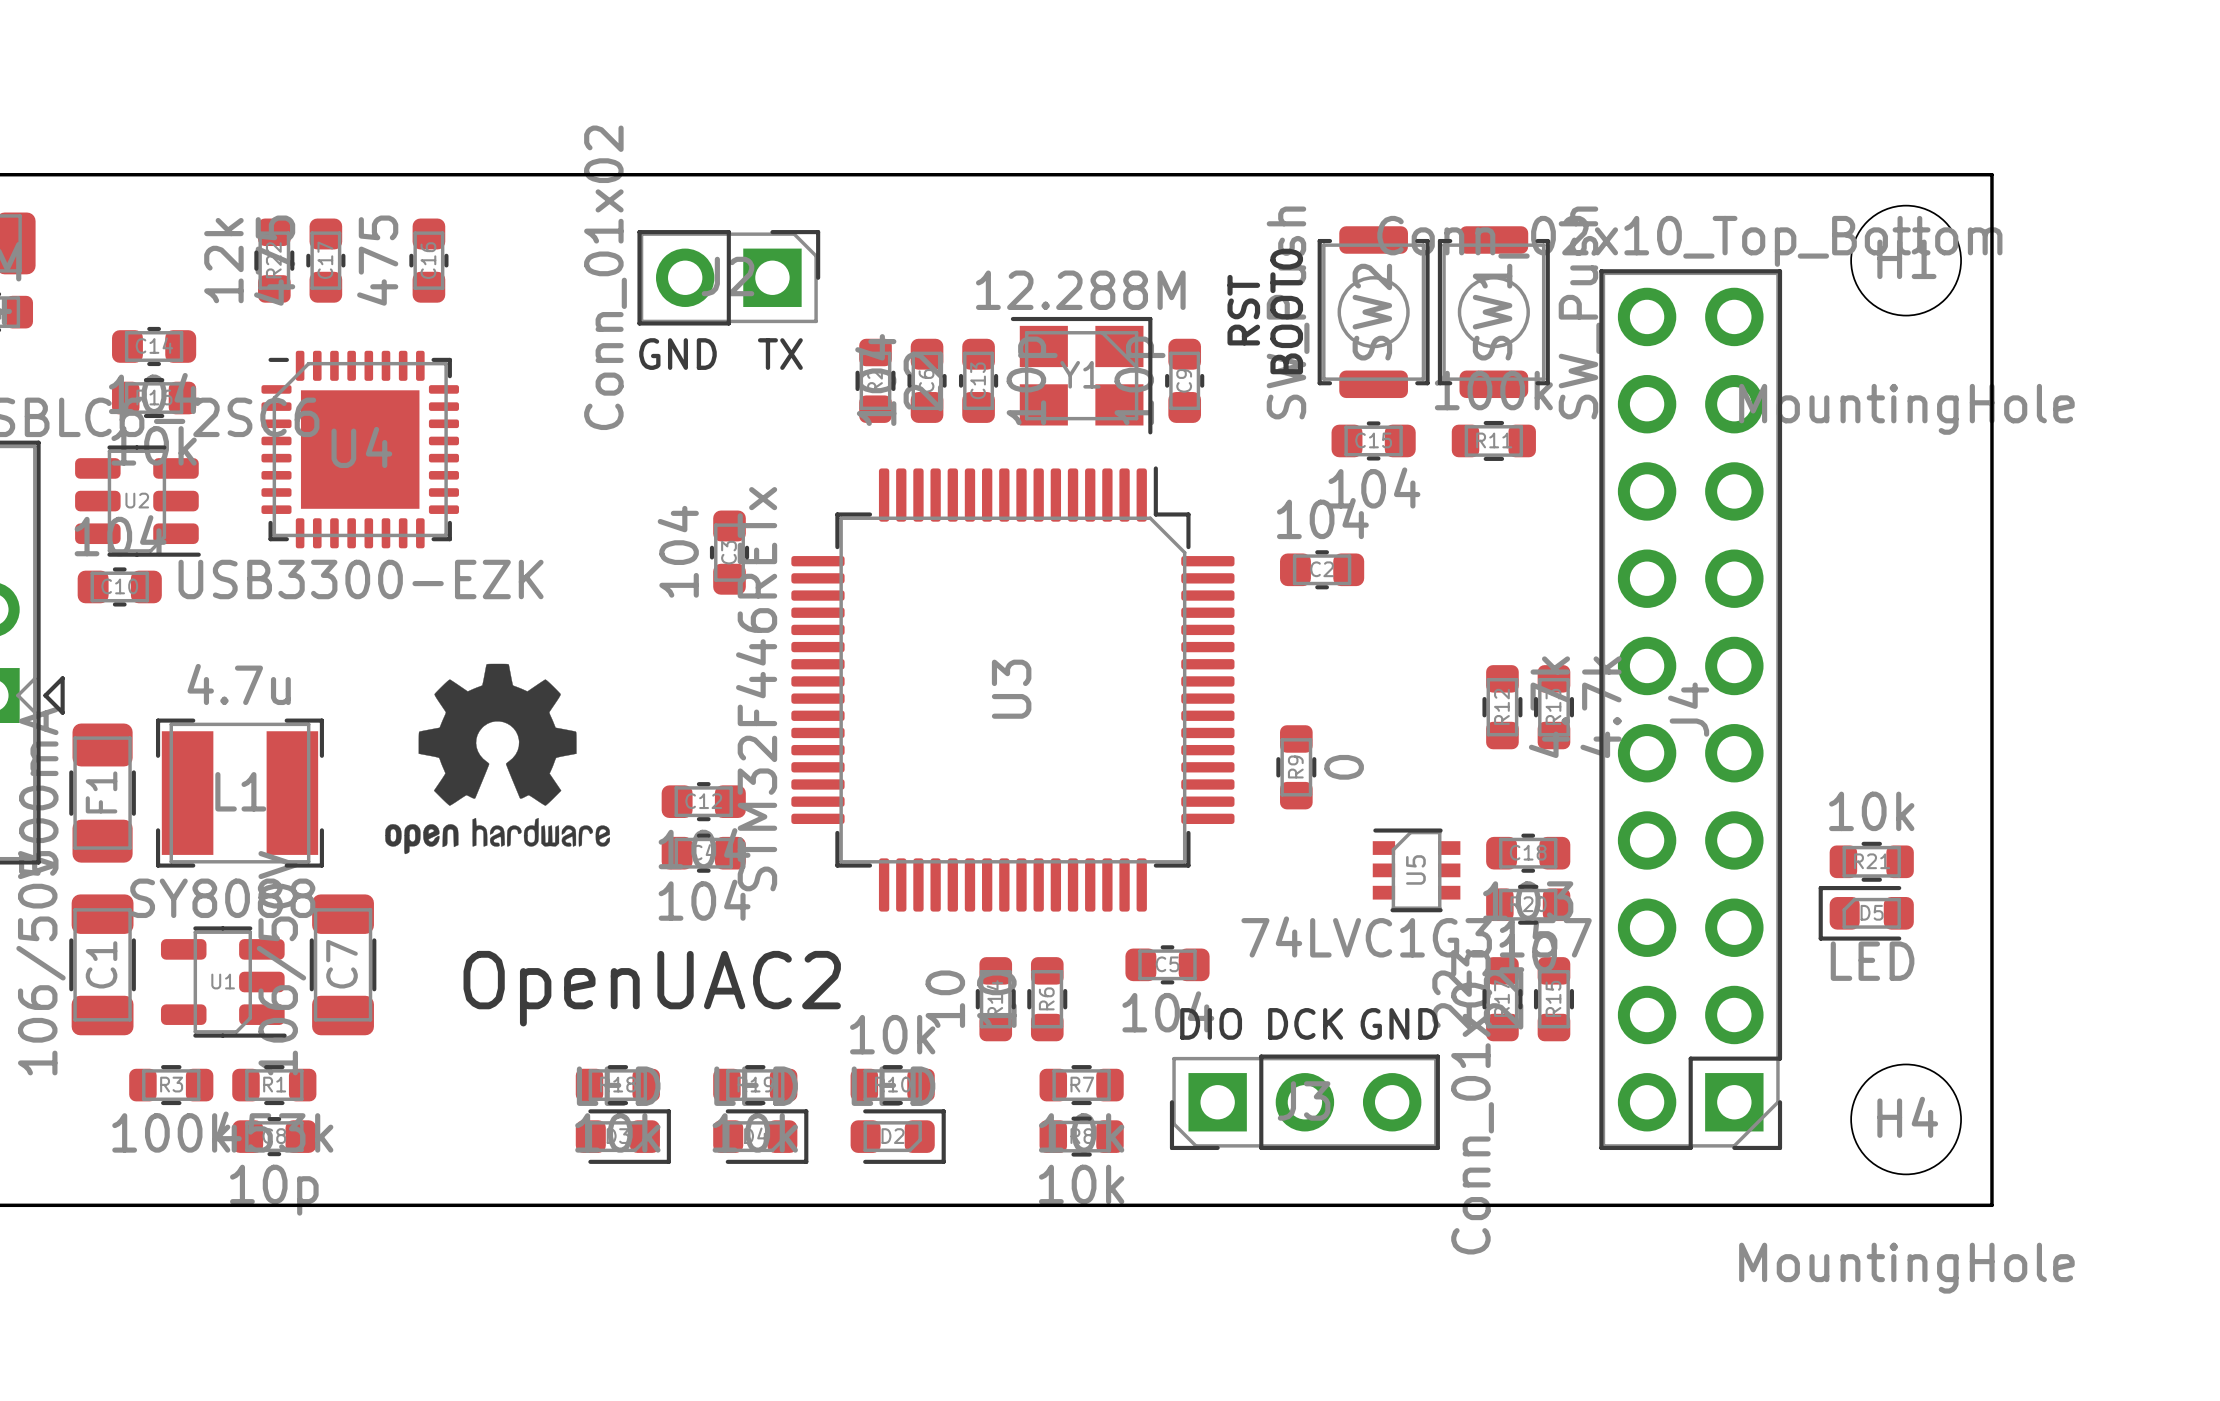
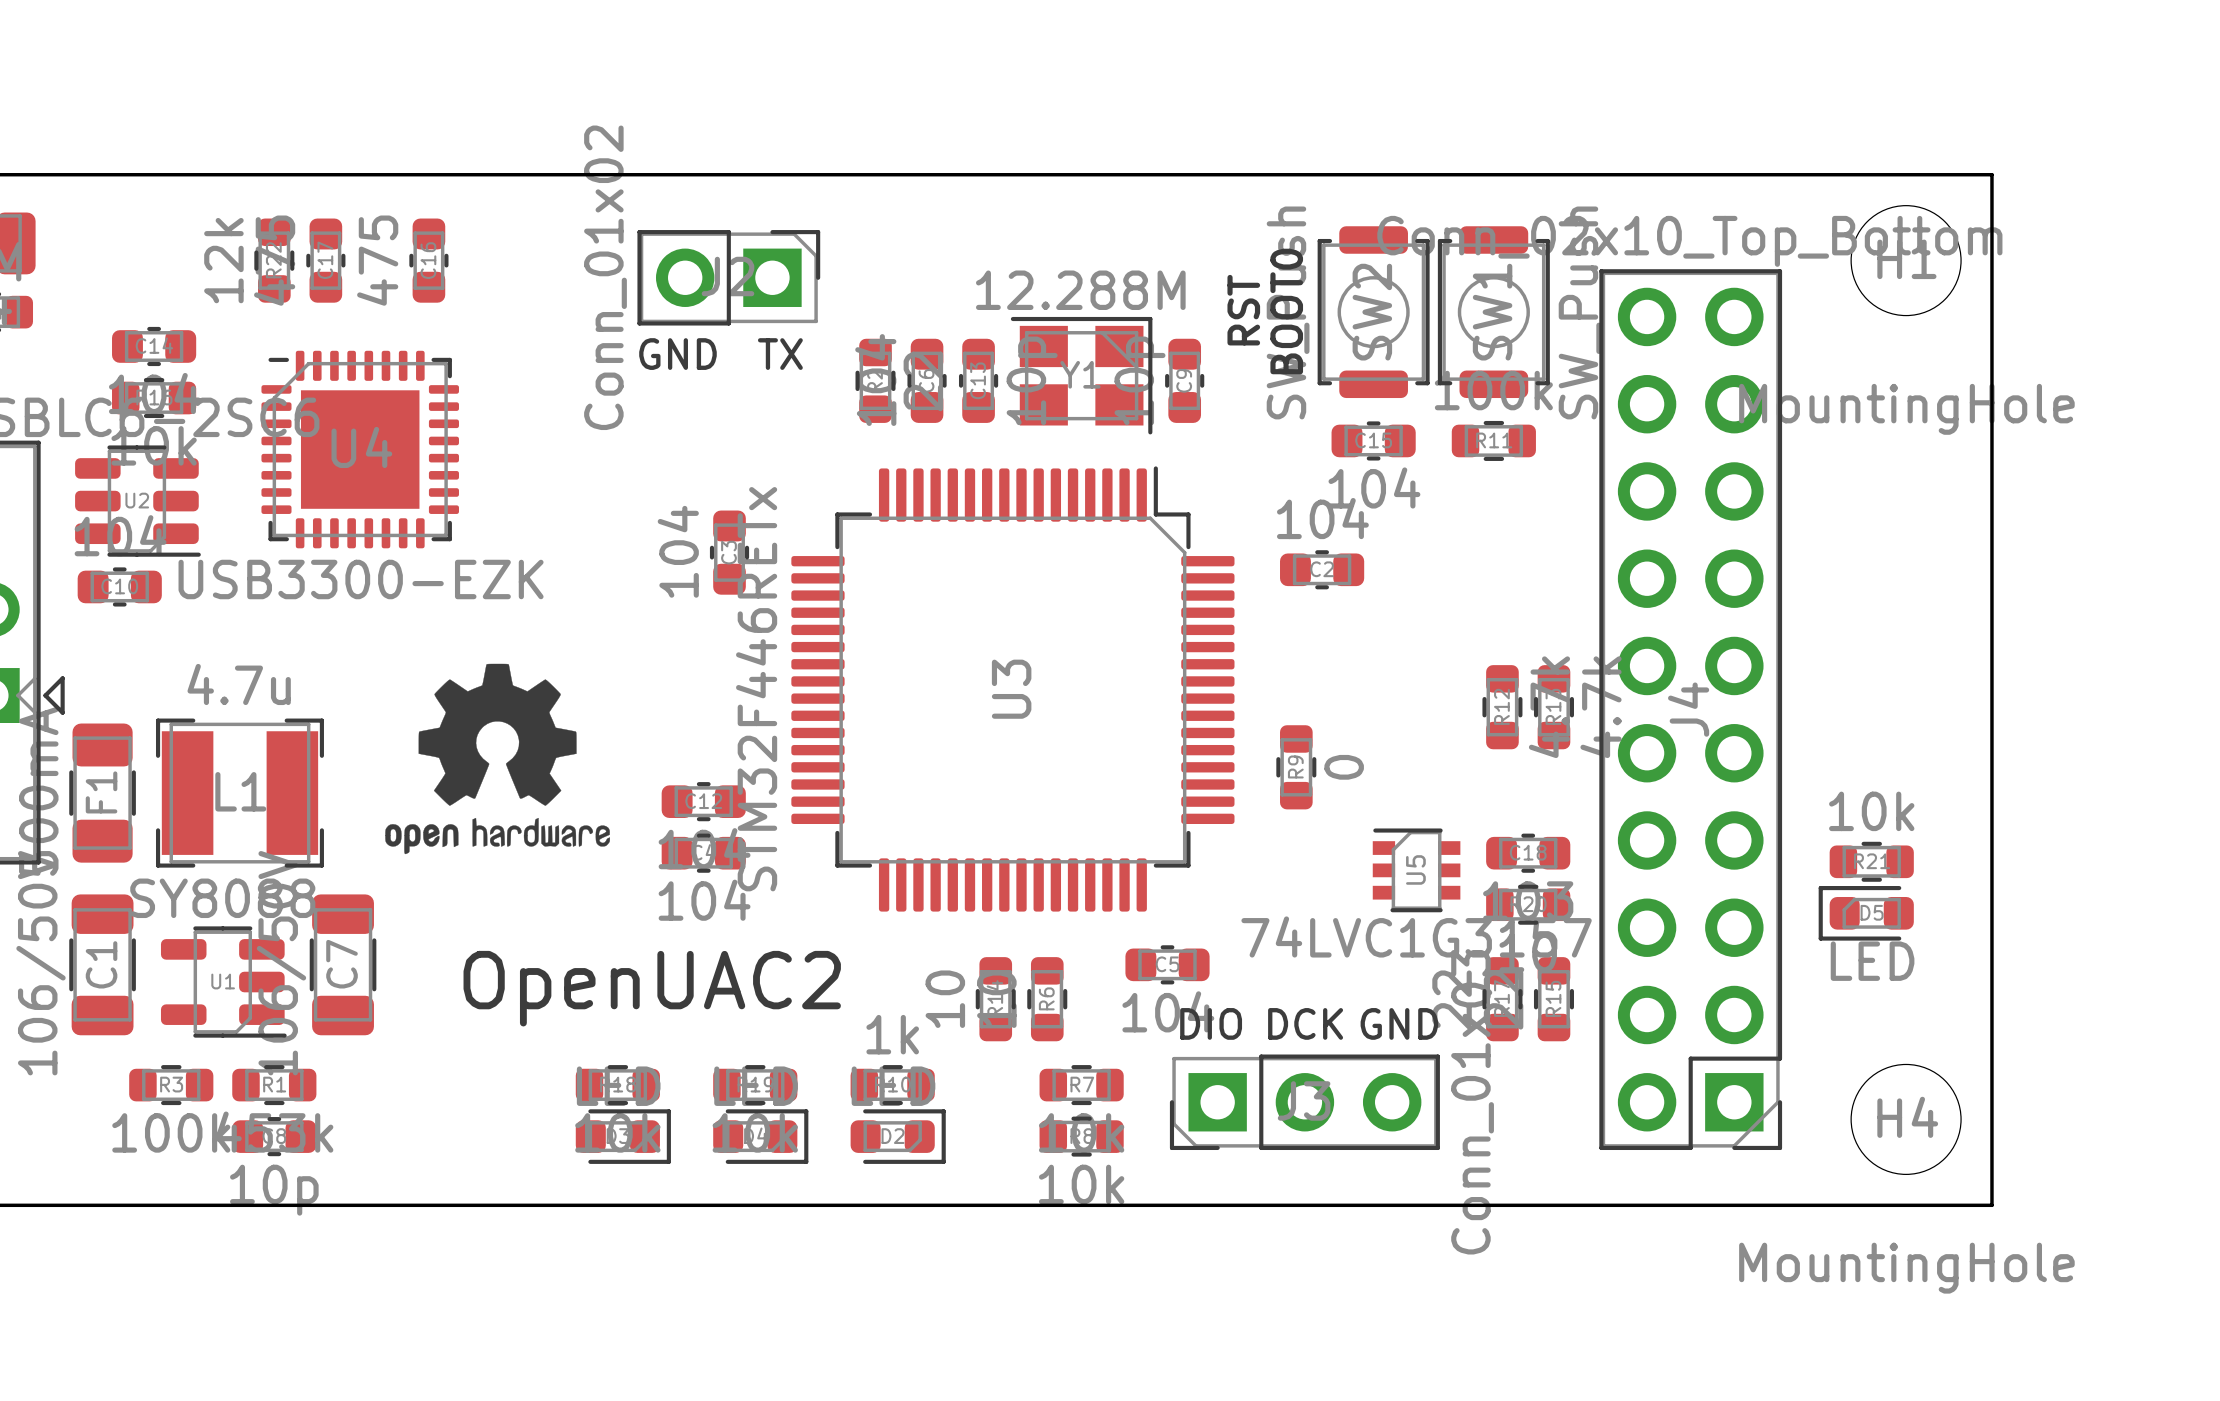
part value: 10k (892, 1034) -> 1k (892, 1034)

